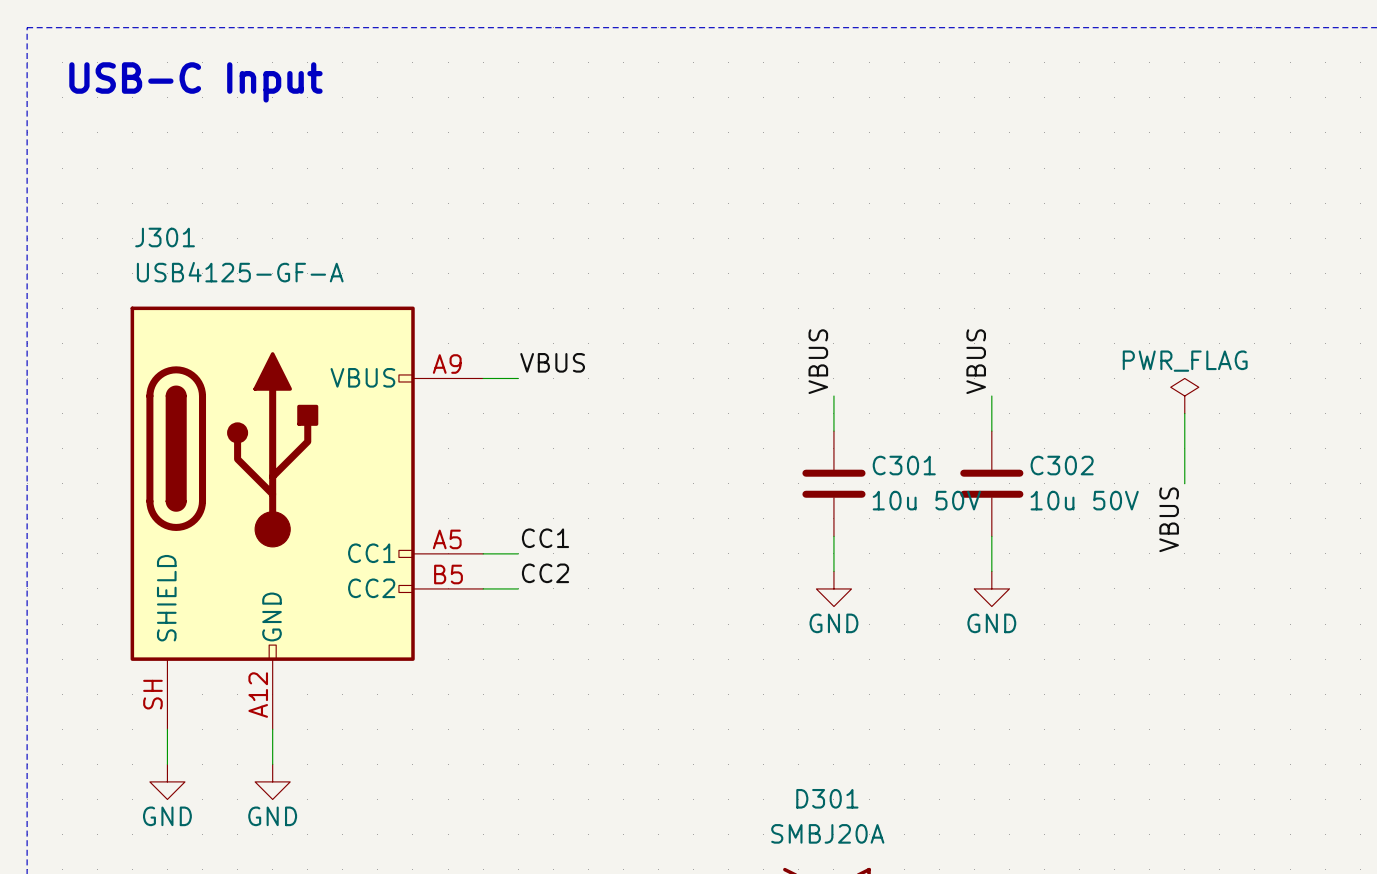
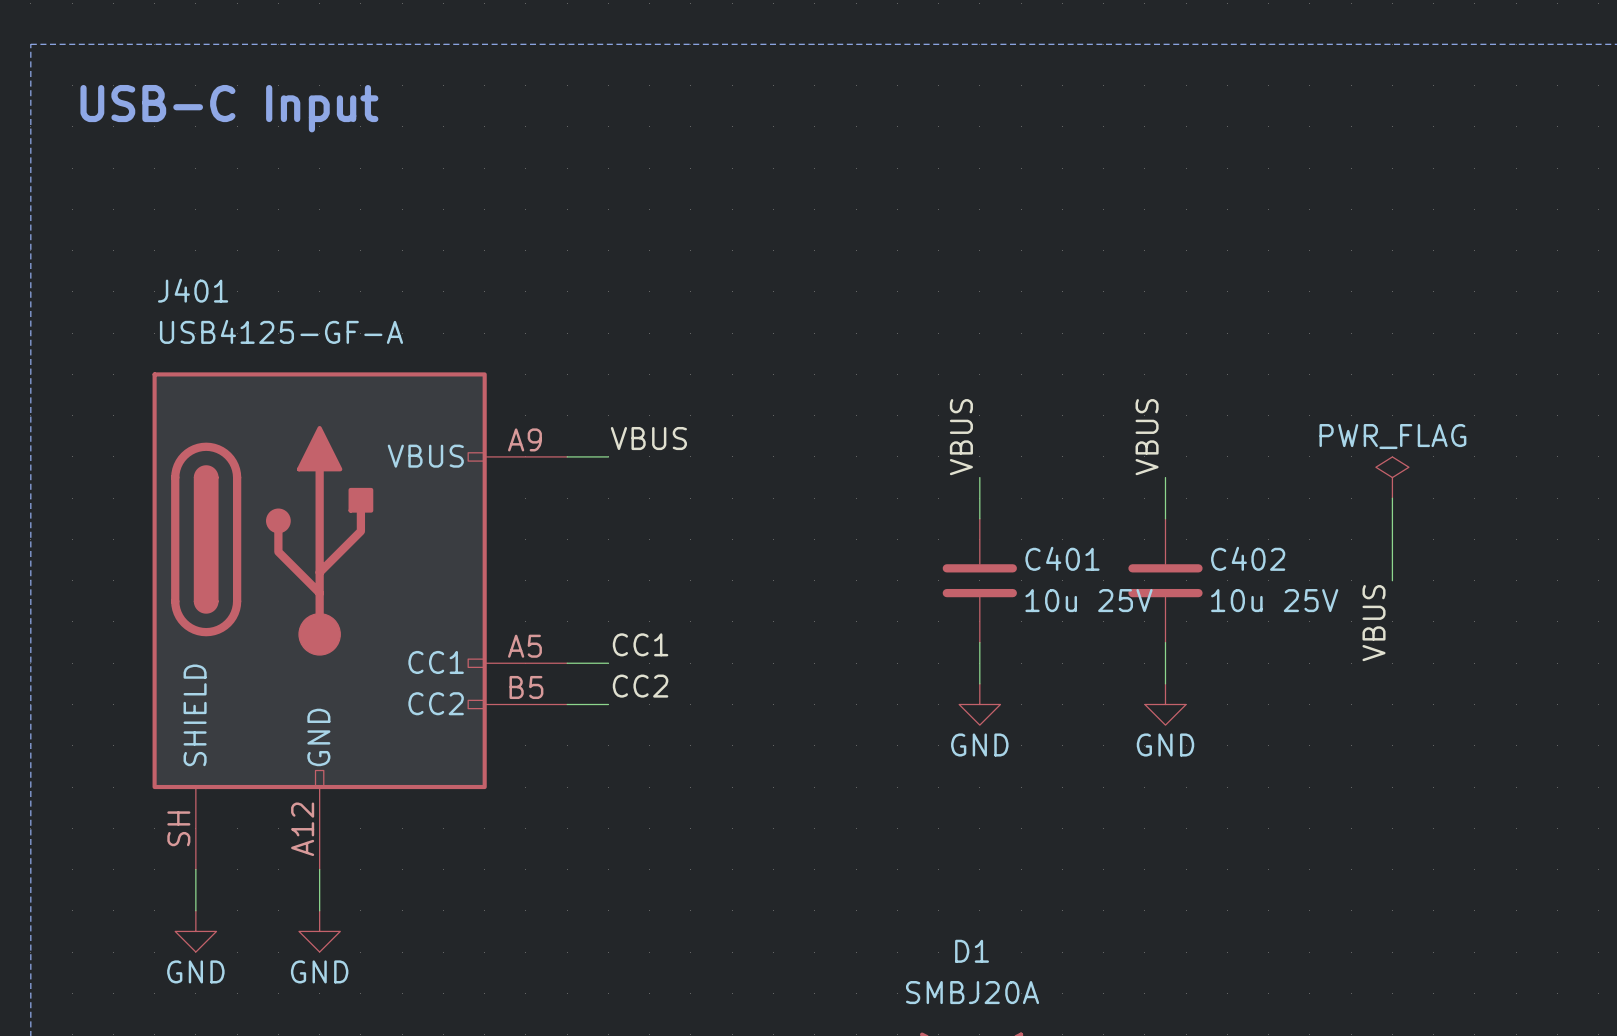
J301 name: J301 (165, 237) -> J401 (193, 290)
C301 name: C301 (904, 465) -> C401 (1062, 558)
C302 name: C302 (1062, 465) -> C402 (1248, 558)
C301 value: 10u 50V (926, 500) -> 10u 25V (1089, 600)
C302 value: 10u 50V (1084, 500) -> 10u 25V (1274, 600)
D301 name: D301 (827, 798) -> D1 (972, 951)

